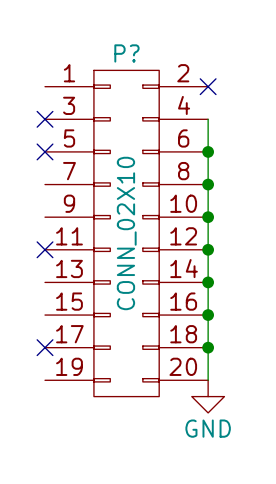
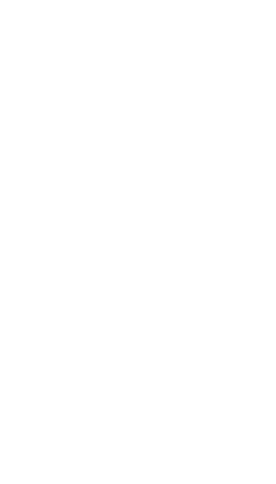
no-connect mark: (208, 86) -> none
no-connect mark: (45, 119) -> none
wire: (208, 119) (208, 380) -> none
no-connect mark: (45, 151) -> none
junction: (208, 151) -> none
junction: (208, 184) -> none
junction: (208, 217) -> none
P?: CONN_02X10 (126, 233) -> none
no-connect mark: (45, 249) -> none
junction: (208, 249) -> none
junction: (208, 282) -> none
junction: (208, 315) -> none
no-connect mark: (45, 347) -> none
junction: (208, 347) -> none
power symbol: GND (208, 396) -> none

